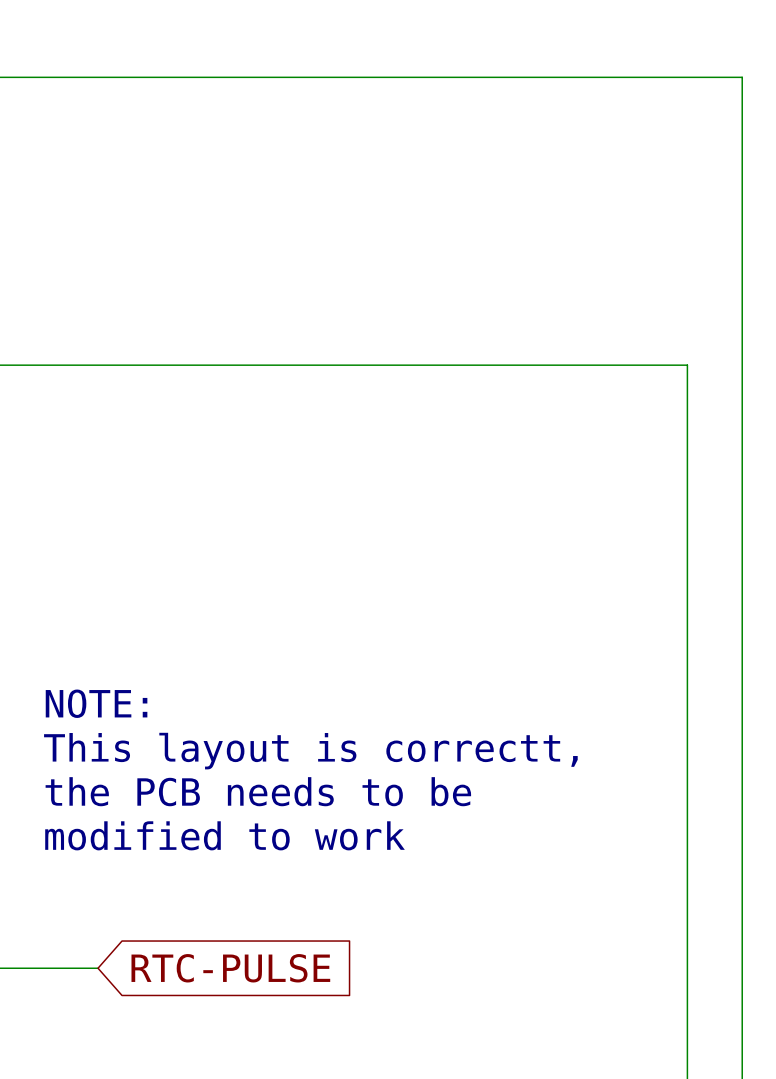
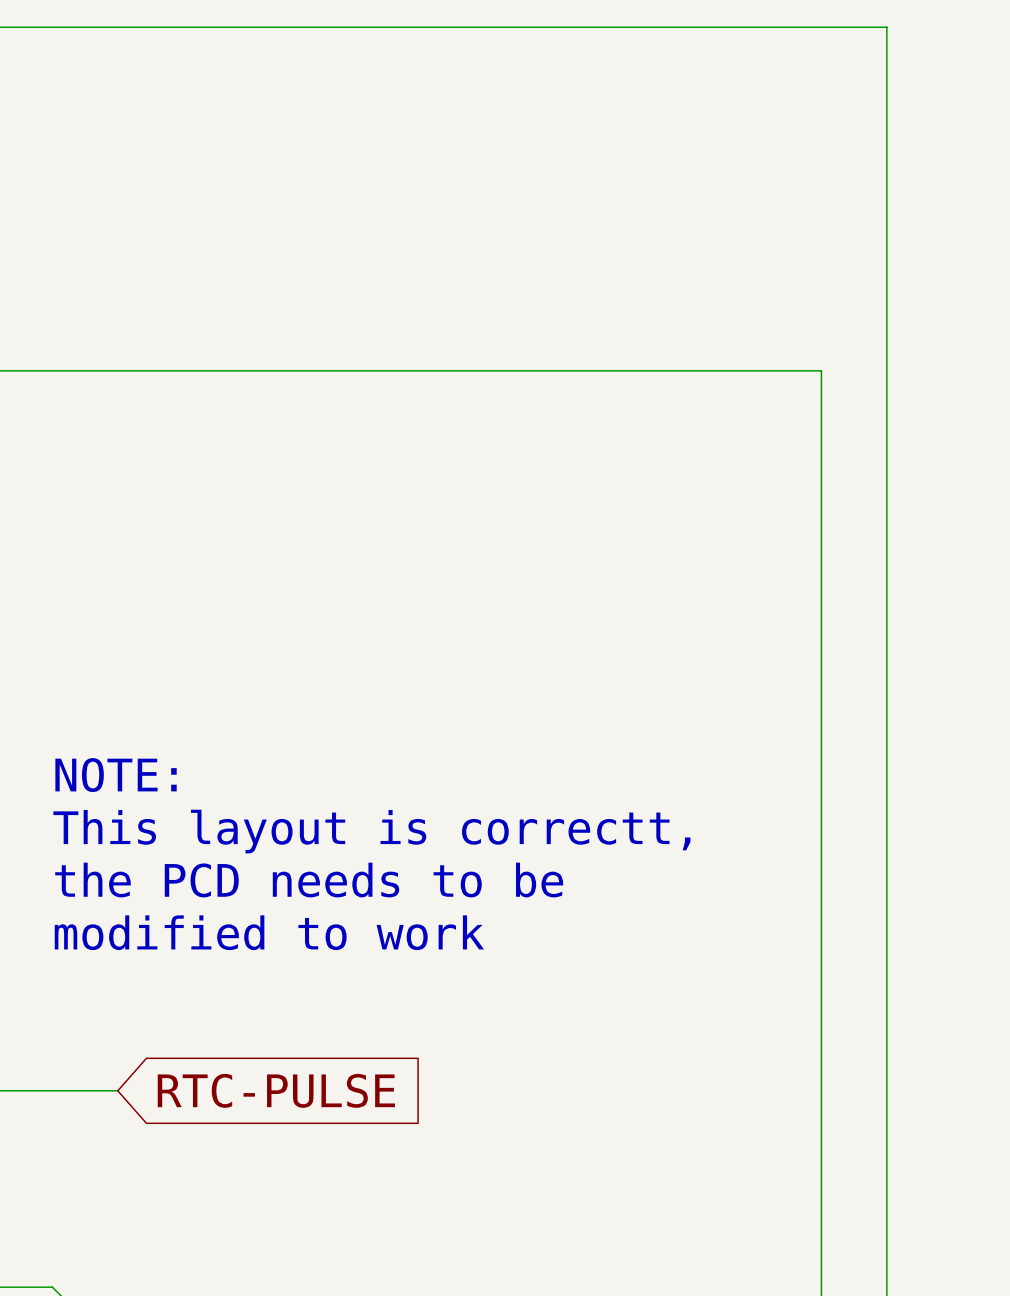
text: the PCB needs to be (258, 791) -> the PCD needs to be (309, 880)

